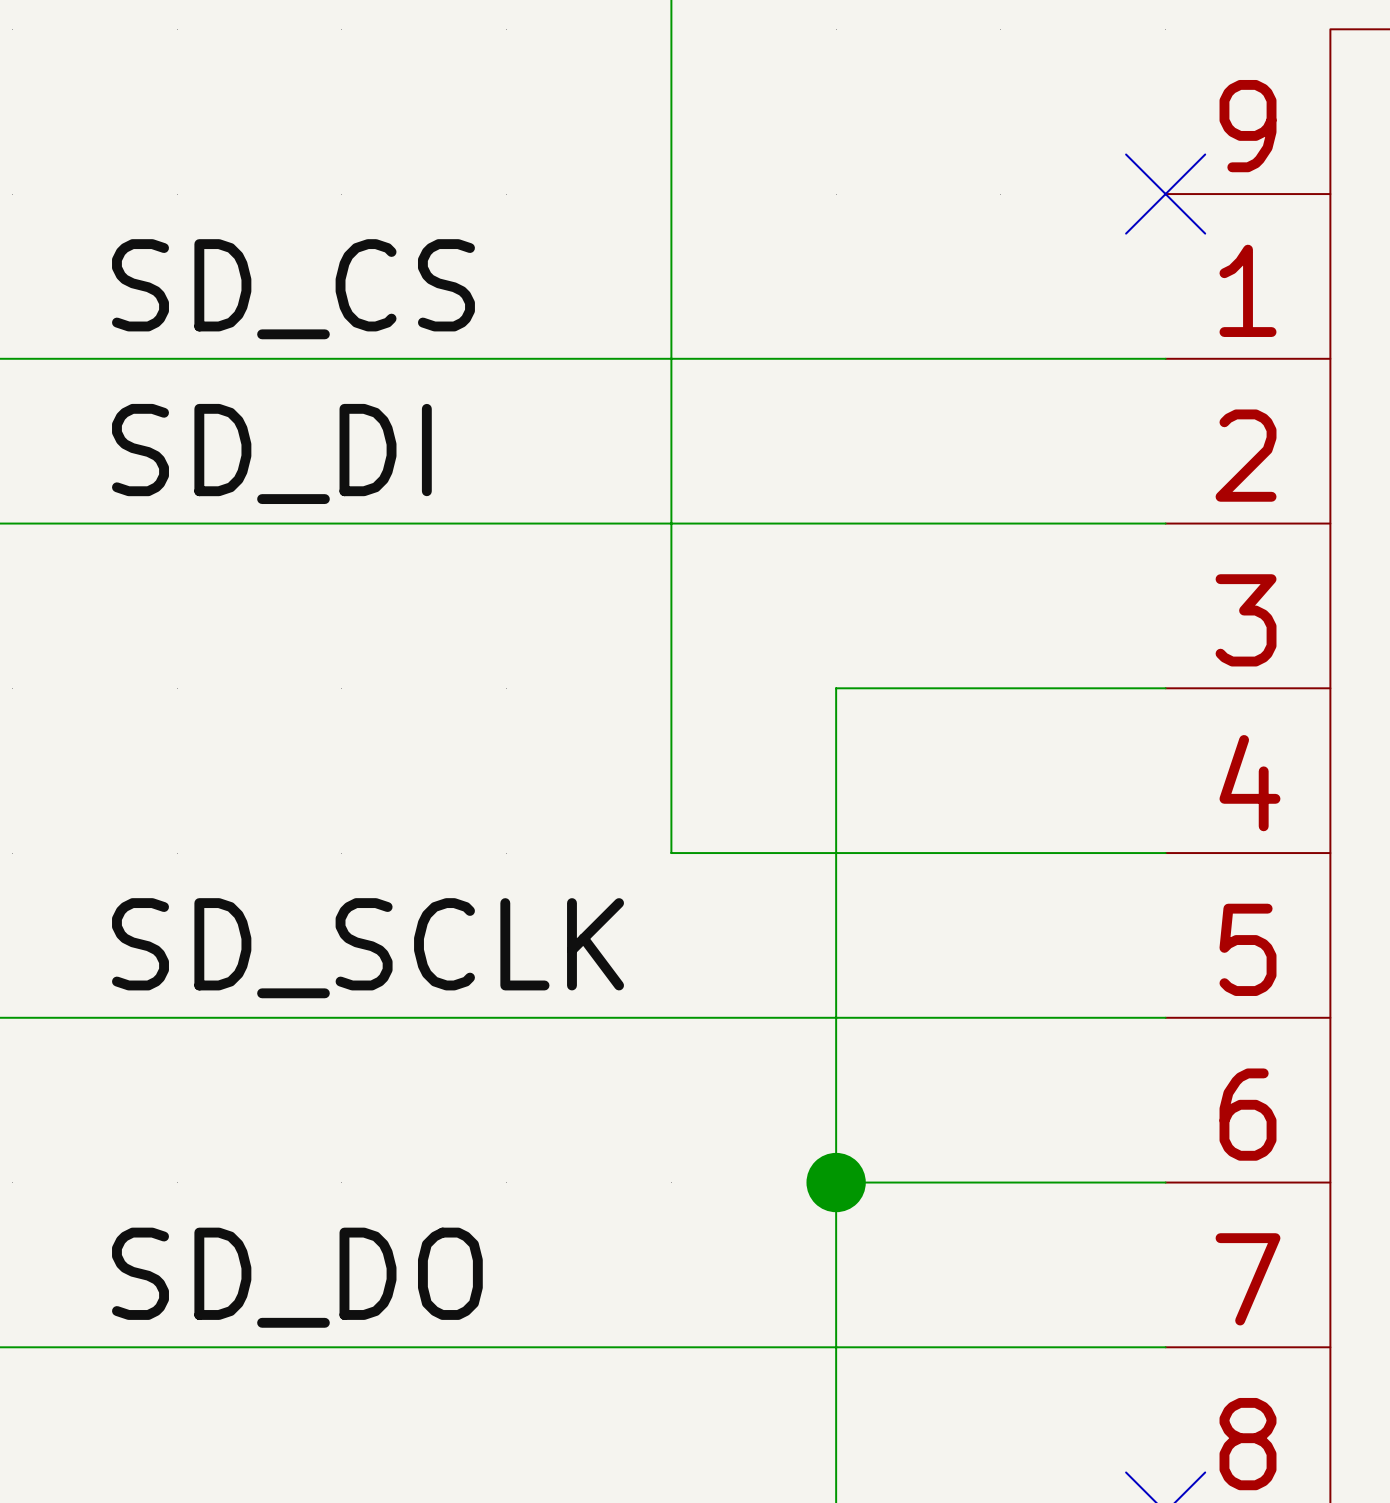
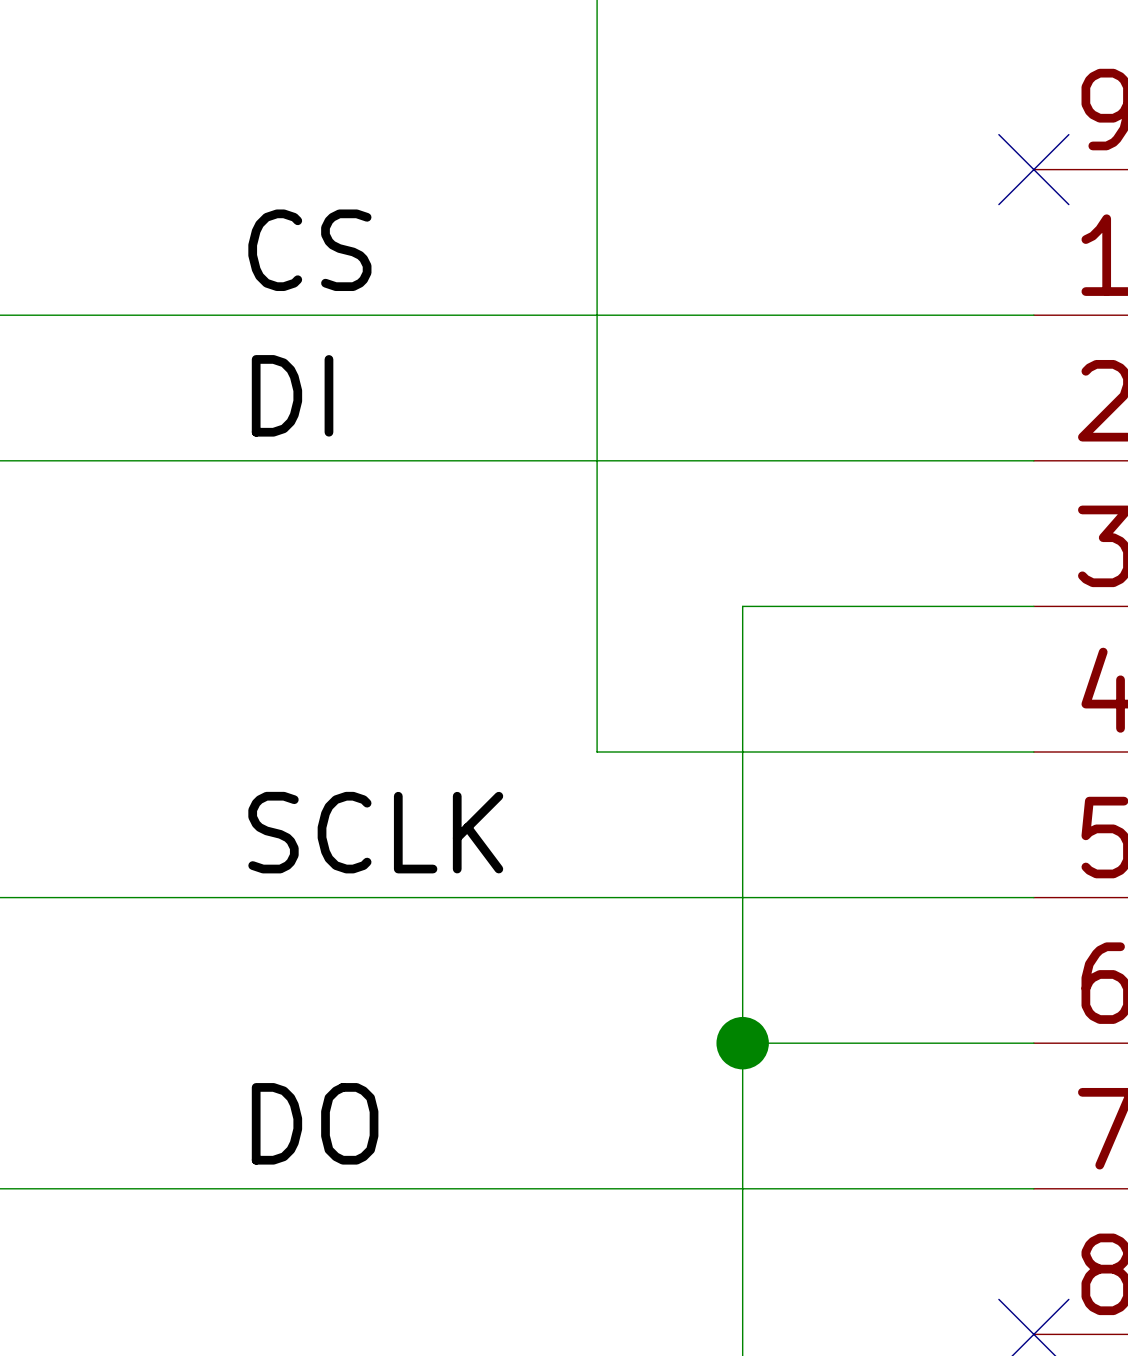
label: none -> CS (309, 250)
label: SD_CS (293, 289) -> none
label: none -> DI (292, 395)
label: SD_DI (271, 453) -> none
label: SD_SCLK (368, 948) -> SCLK (375, 832)
label: none -> DO (315, 1123)
label: SD_DO (297, 1277) -> none

